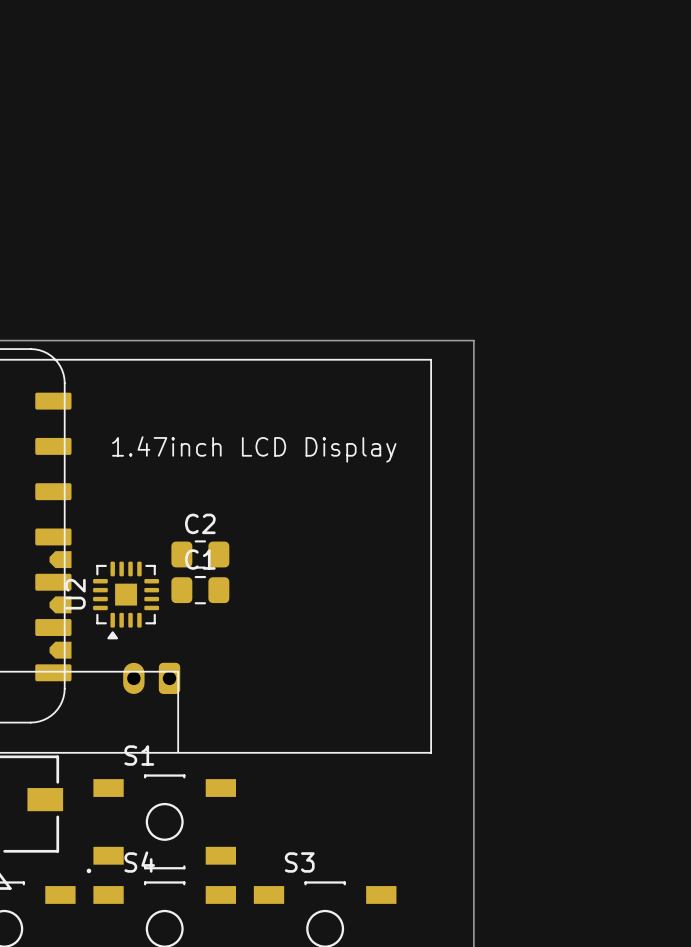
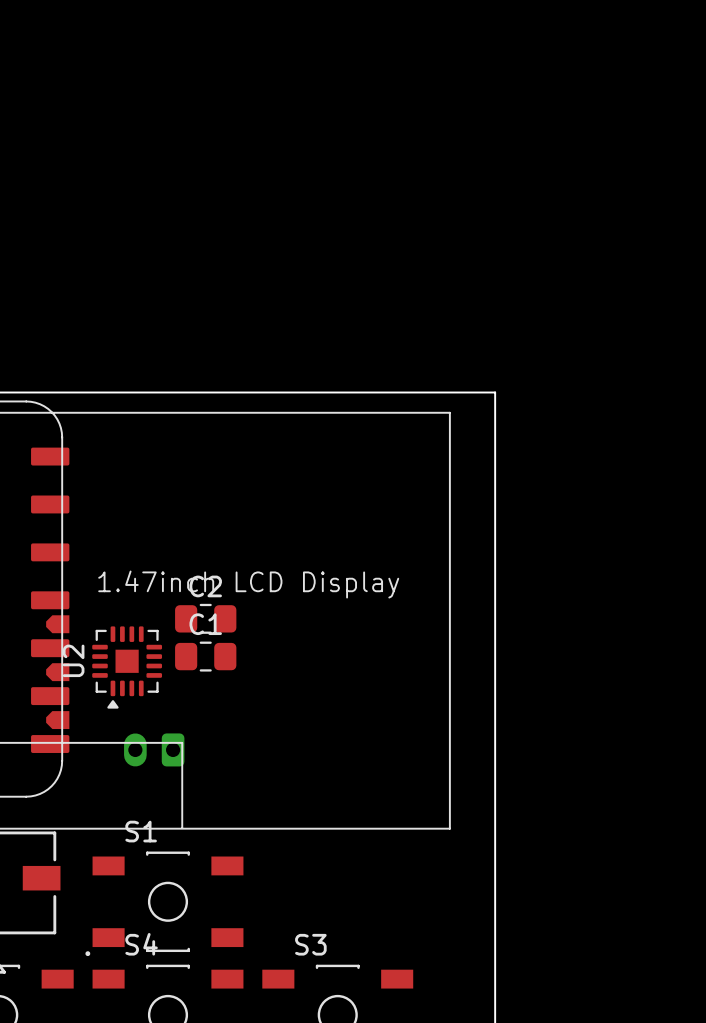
1.47inch LCD Display name position: 1.47inch LCD Display (254, 449) -> 1.47inch LCD Display (248, 584)

